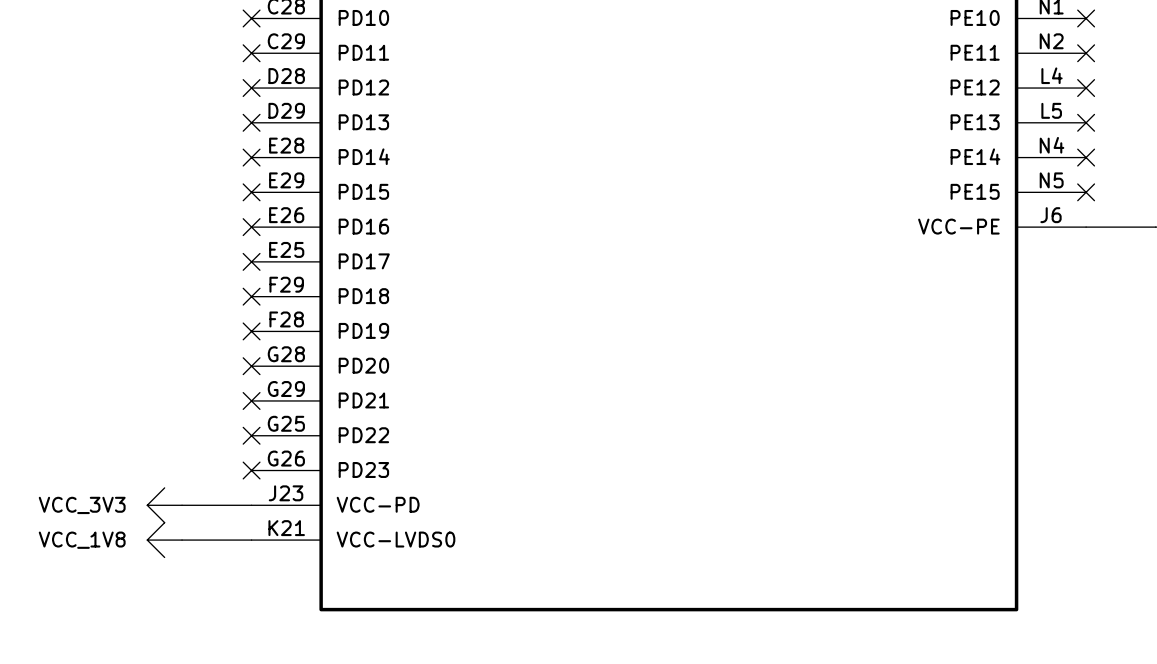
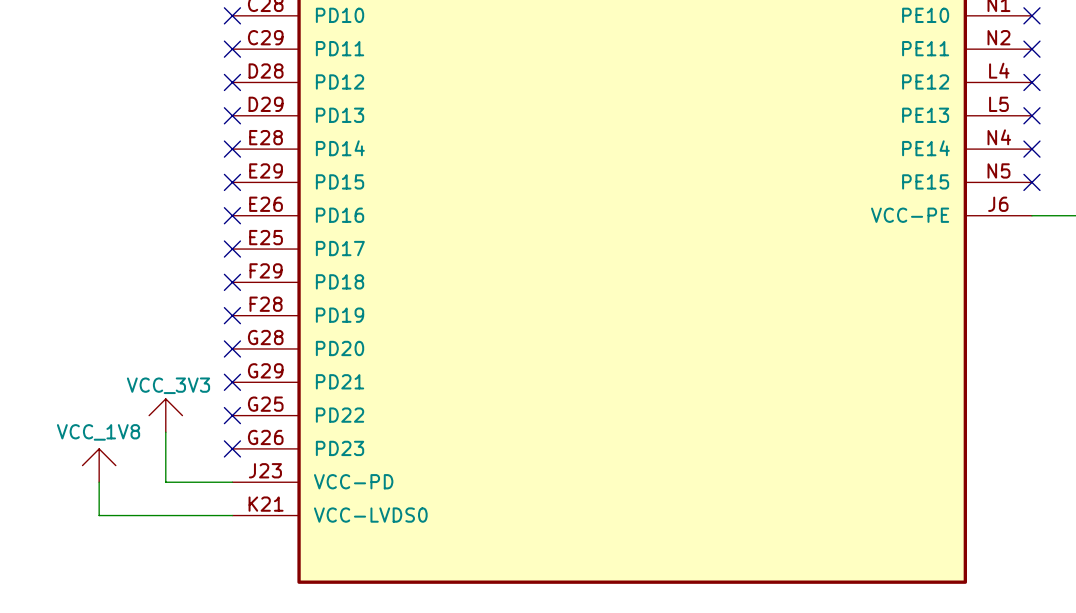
wire: none -> (165, 432) (165, 482)
power symbol text position: VCC_3V3 (82, 505) -> VCC_3V3 (168, 385)
wire: none -> (99, 482) (99, 515) (165, 515)
power symbol rotation: 0° (164, 505) -> 90° clockwise (165, 415)
power symbol position: VCC_3V3 (164, 505) -> VCC_3V3 (165, 415)
power symbol text position: VCC_1V8 (82, 540) -> VCC_1V8 (98, 432)
power symbol rotation: 0° (164, 540) -> 90° clockwise (99, 465)
power symbol position: VCC_1V8 (164, 540) -> VCC_1V8 (99, 465)

